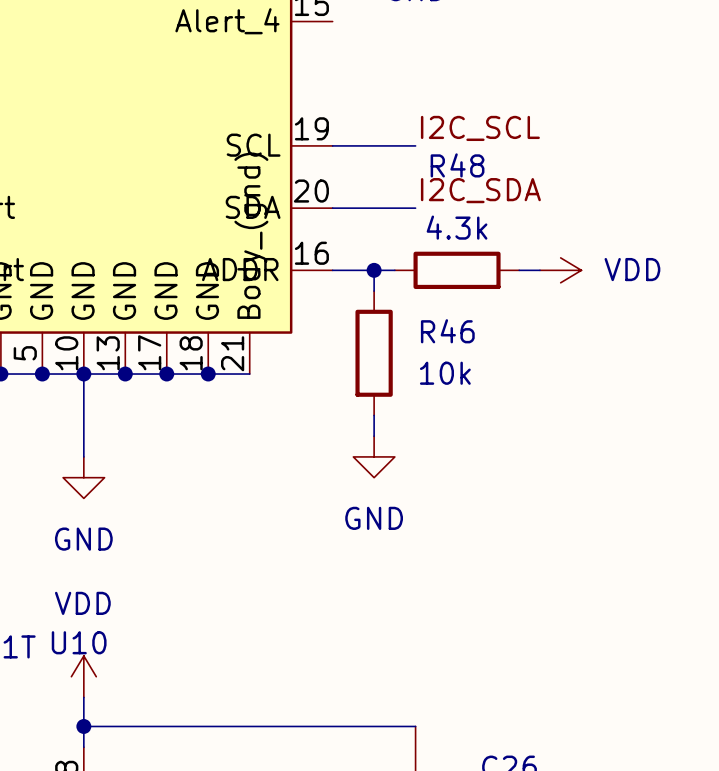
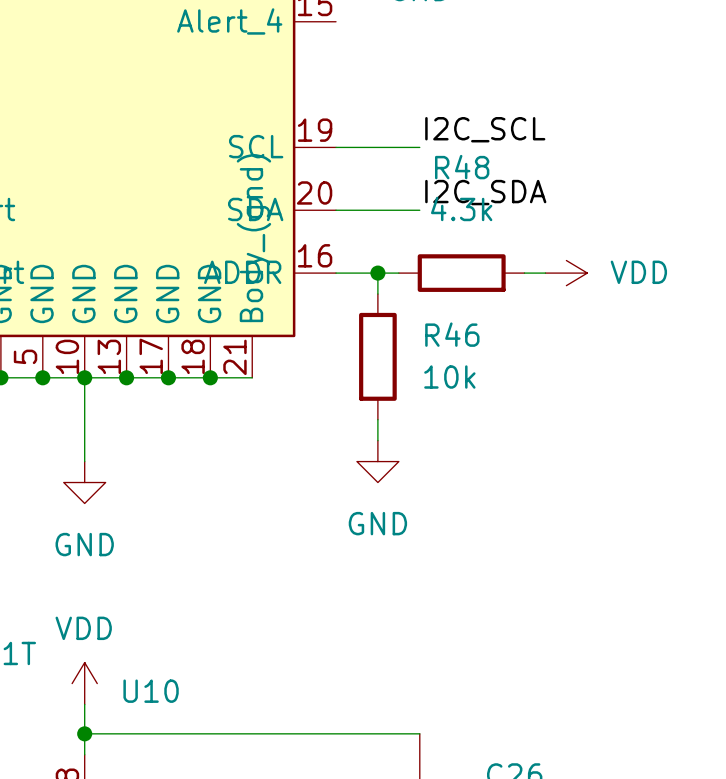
R48 value position: 4.3k (457, 227) -> 4.3k (461, 208)
power symbol text position: VDD (82, 603) -> VDD (83, 628)
U10 name position: U10 (79, 642) -> U10 (151, 691)

